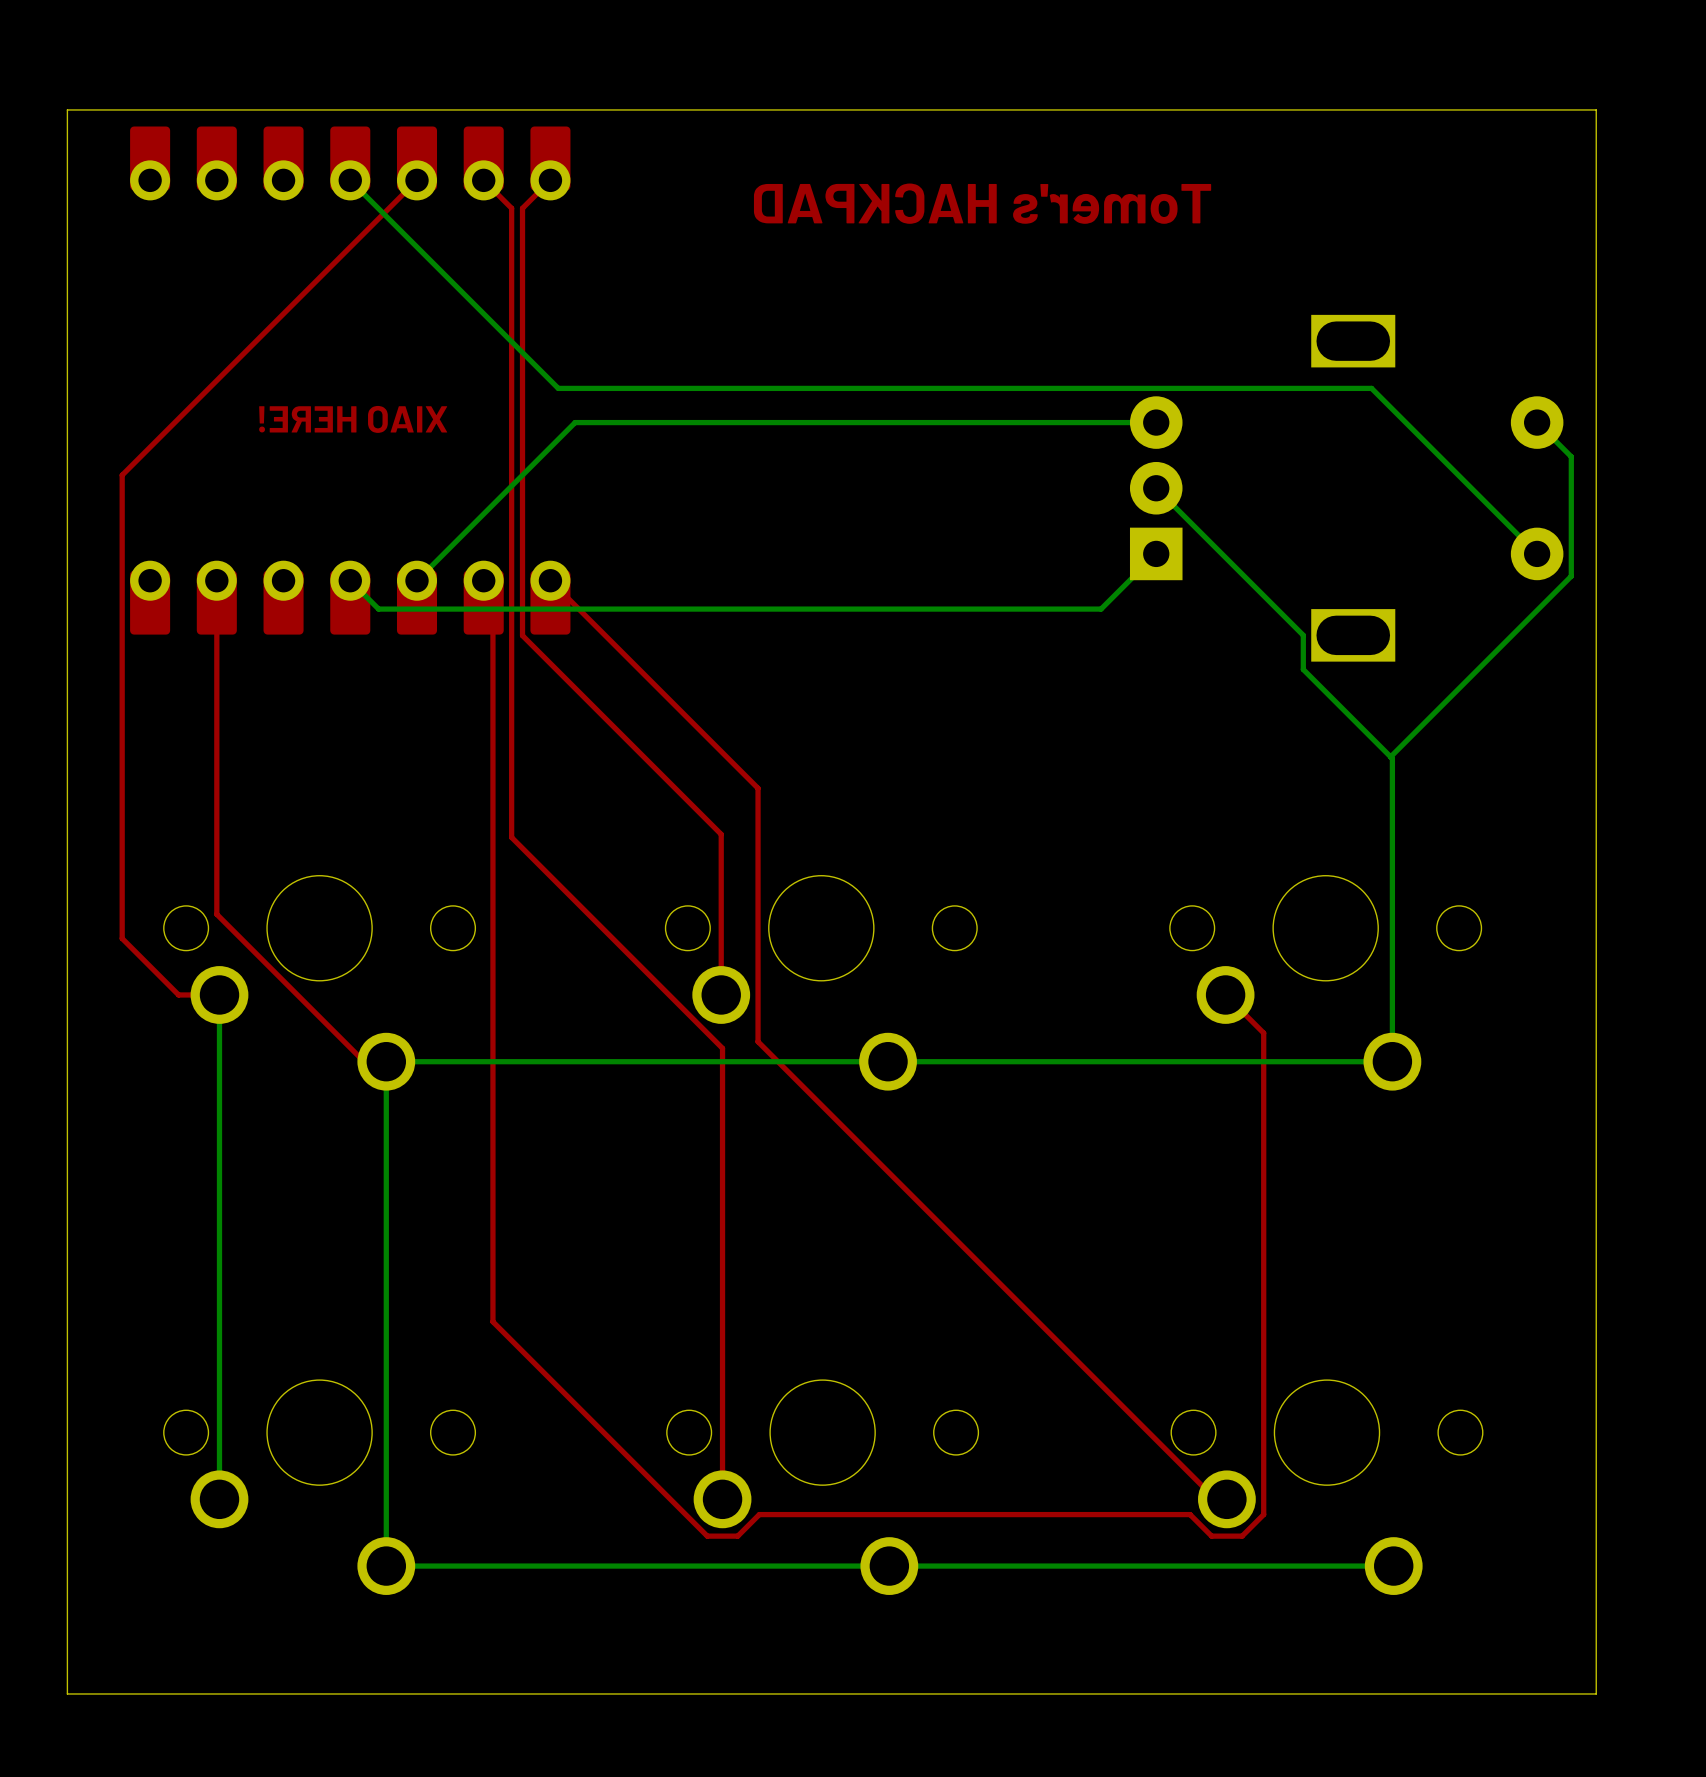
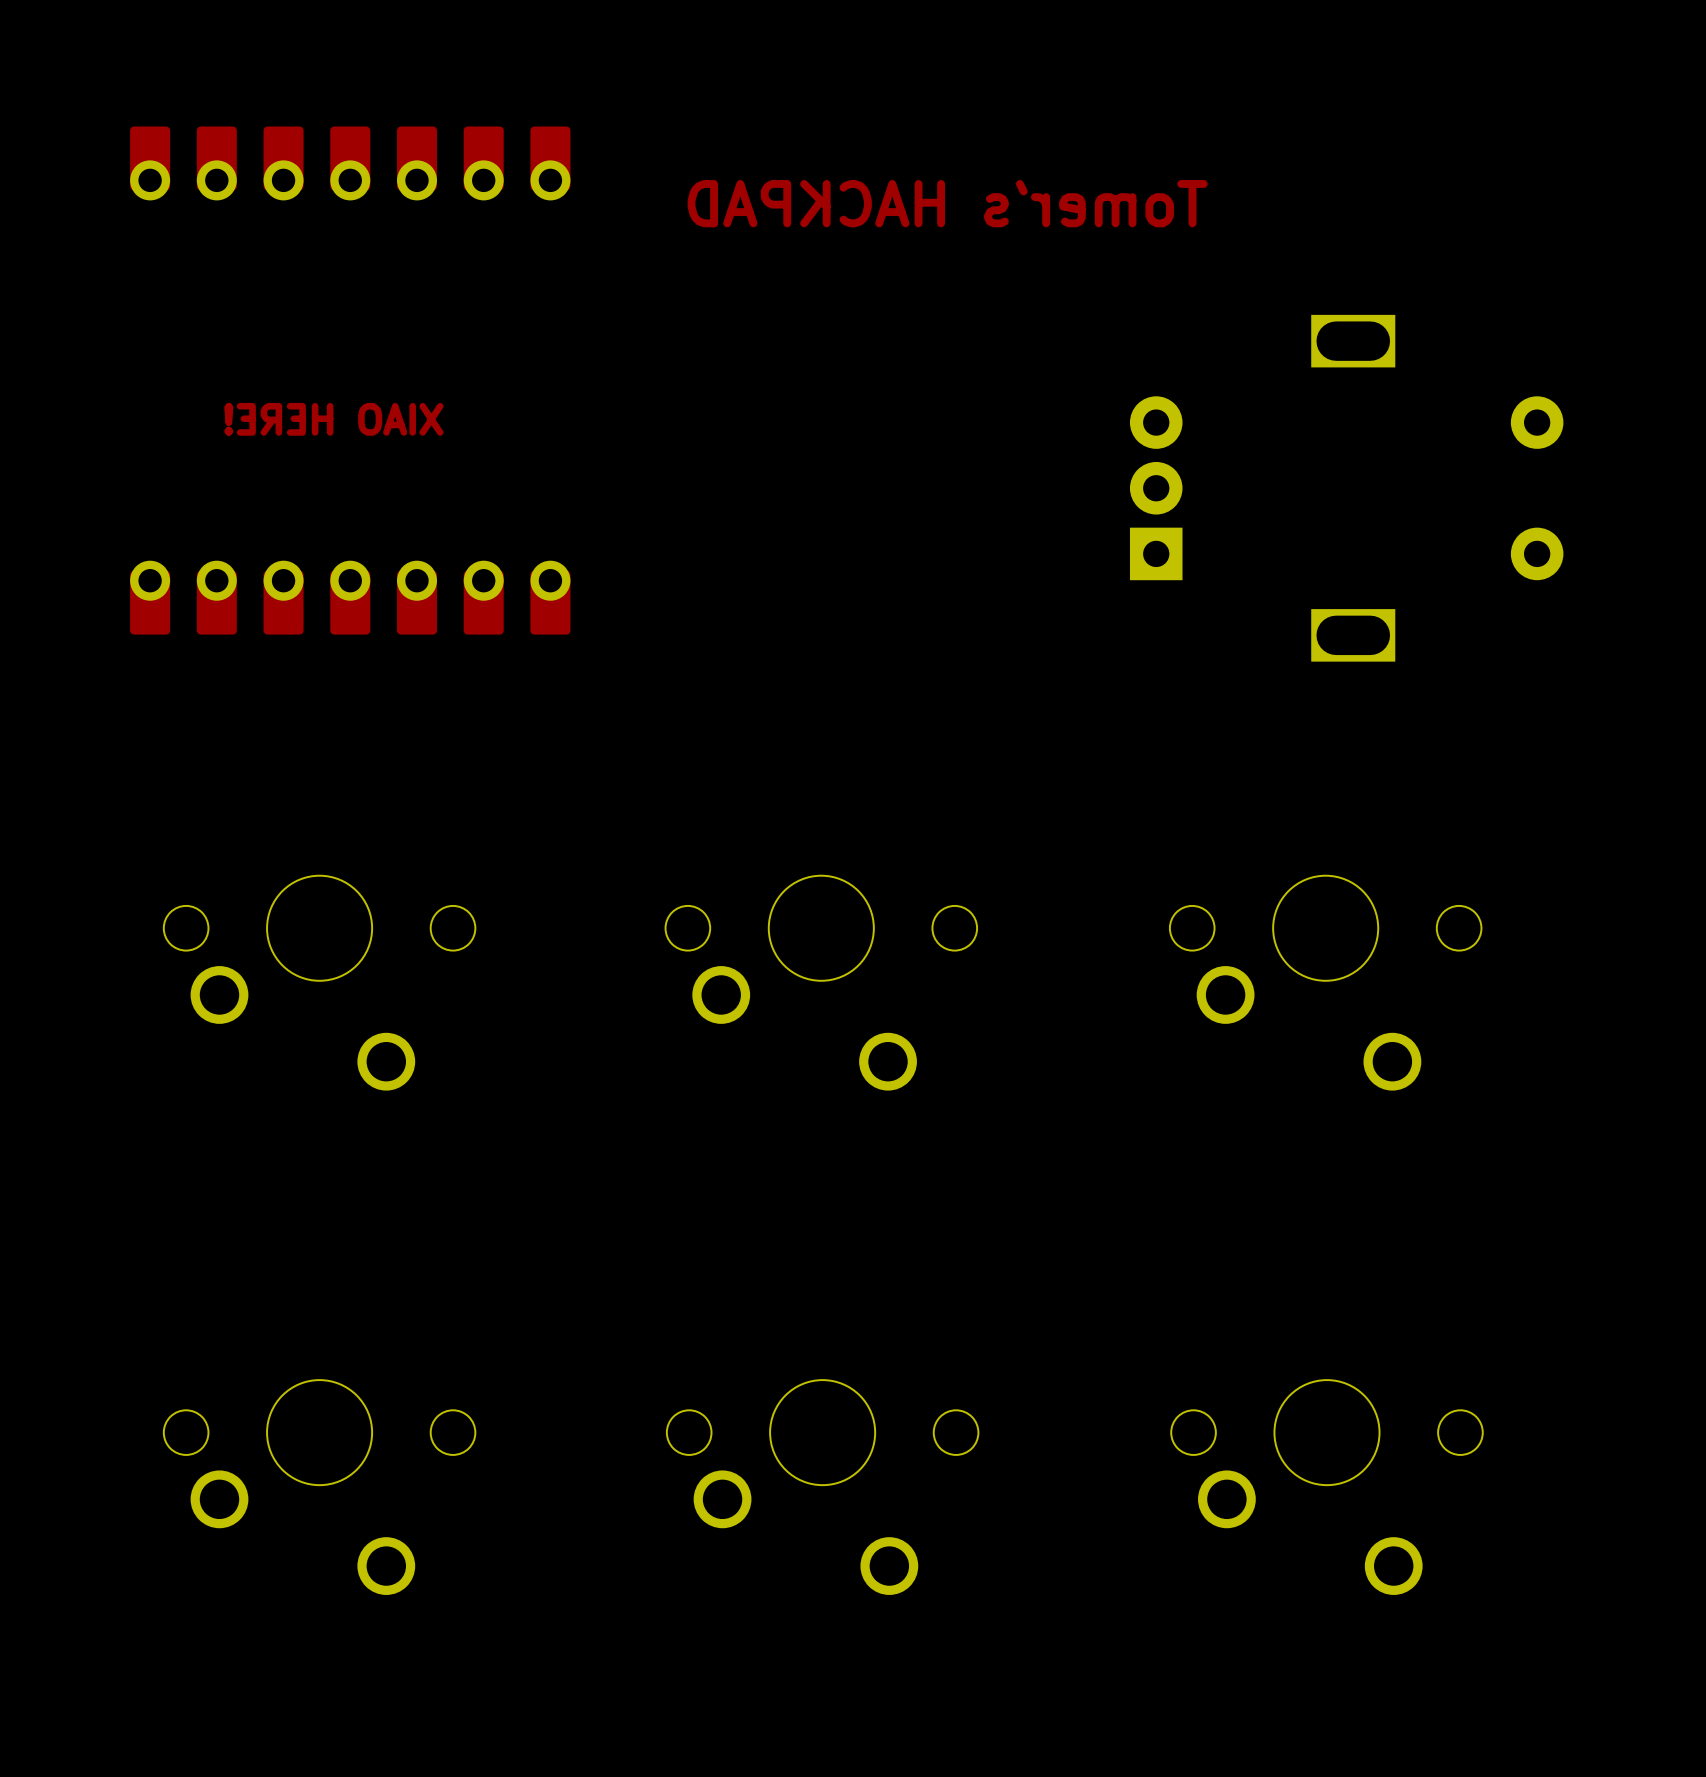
board edge: (1596, 109) (67, 109) (67, 1693) (1596, 1693) (1596, 109) -> none
bottom track: (350, 180) (558, 388) (1371, 388) (1537, 553) -> none
top track: (416, 180) (122, 475) (122, 938) (178, 994) (219, 994) -> none
top track: (483, 180) (511, 208) (511, 837) (722, 1048) (722, 1499) -> none
top track: (550, 180) (522, 208) (522, 635) (721, 834) (721, 994) -> none
bottom track: (1156, 422) (575, 422) (416, 580) -> none
bottom track: (1537, 422) (1571, 456) (1571, 576) (1390, 756) -> none
bottom track: (1156, 488) (1303, 635) (1303, 669) (1392, 758) (1392, 1061) (386, 1061) (386, 1566) (1393, 1566) -> none
bottom track: (1156, 553) (1101, 609) (378, 609) (350, 580) -> none
top track: (483, 580) (492, 589) (492, 1321) (707, 1536) (737, 1536) (759, 1514) (1190, 1514) (1211, 1536) (1242, 1536) (1263, 1514) (1263, 1033) (1225, 994) -> none
top track: (550, 580) (758, 788) (758, 1041) (1215, 1499) (1226, 1499) -> none
top track: (216, 602) (216, 914) (364, 1061) (386, 1061) -> none
bottom track: (219, 994) (219, 1499) -> none

